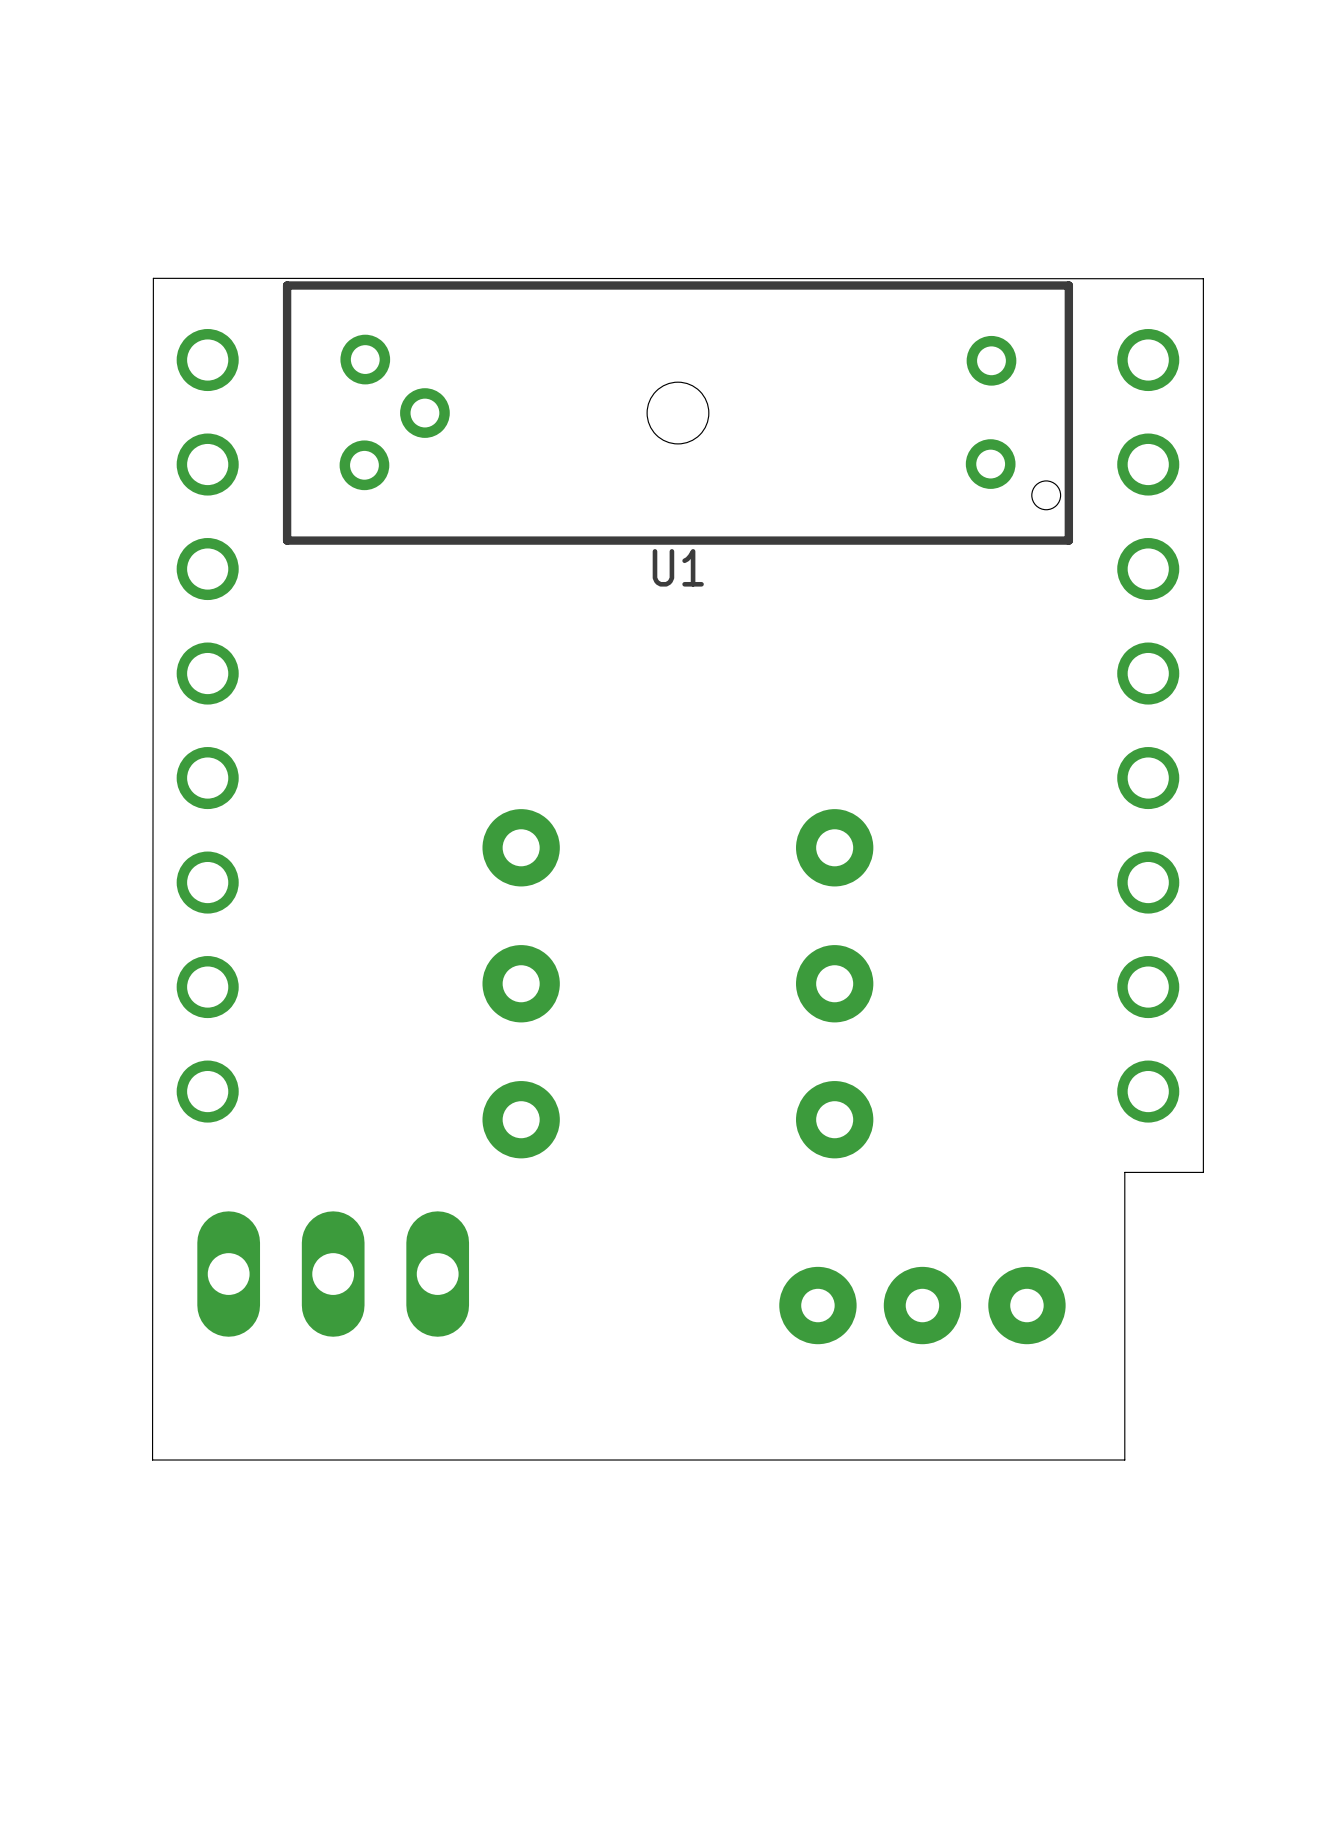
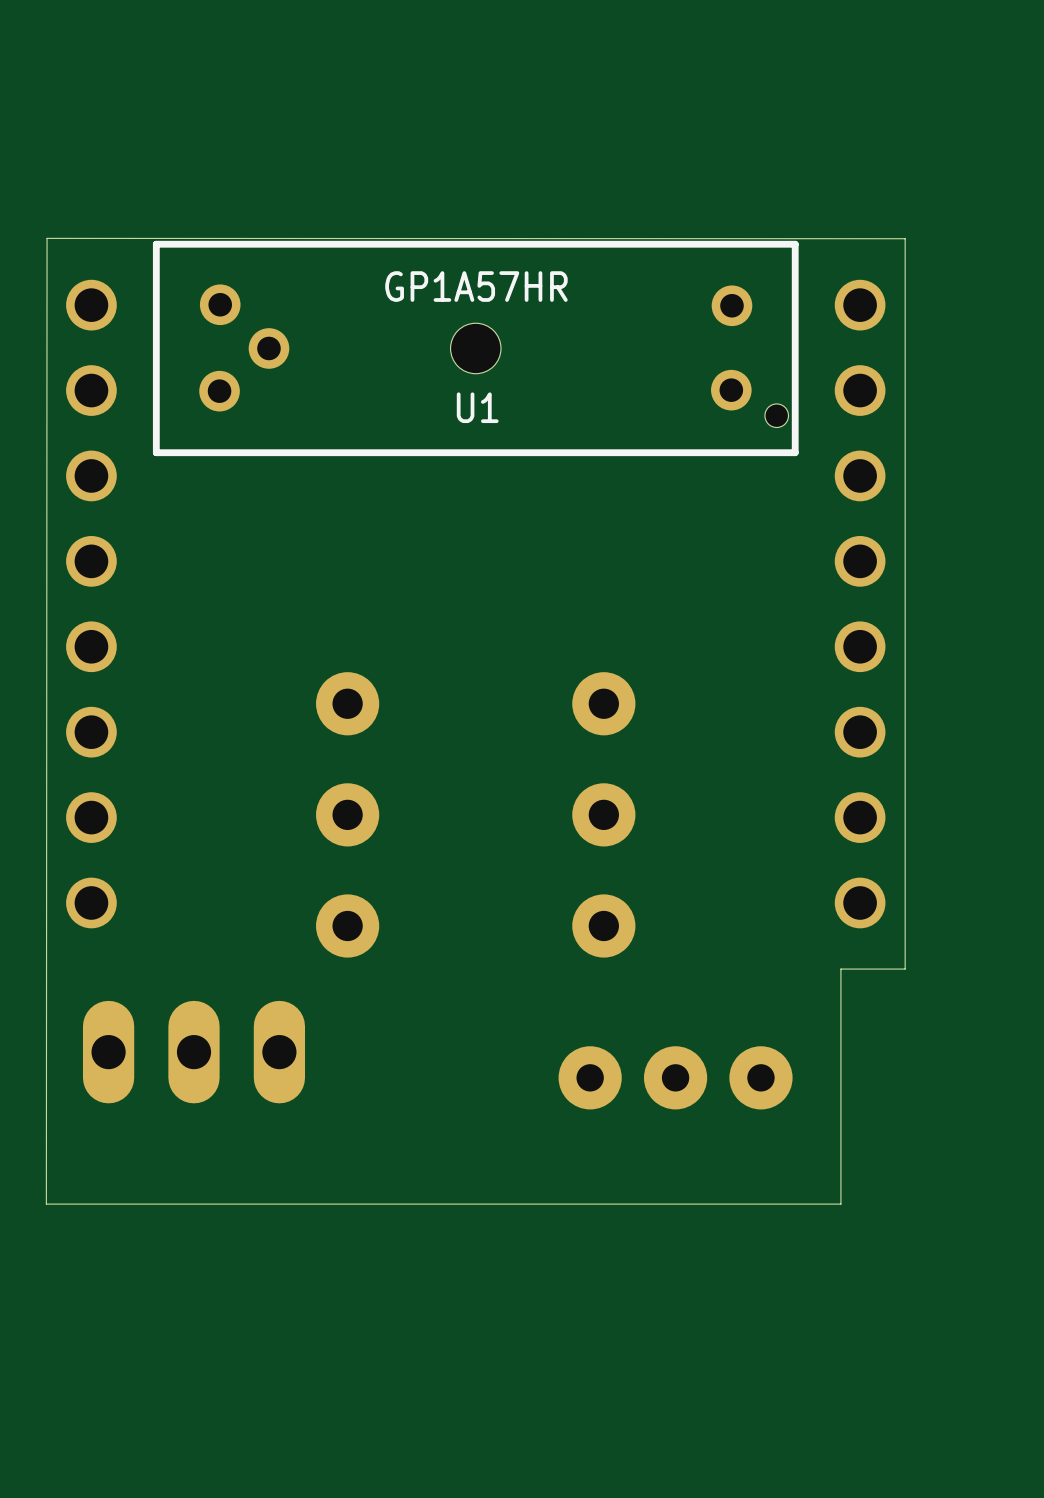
U1 value: none -> GP1A57HR (476, 286)
U1 name position: U1 (678, 567) -> U1 (477, 407)

